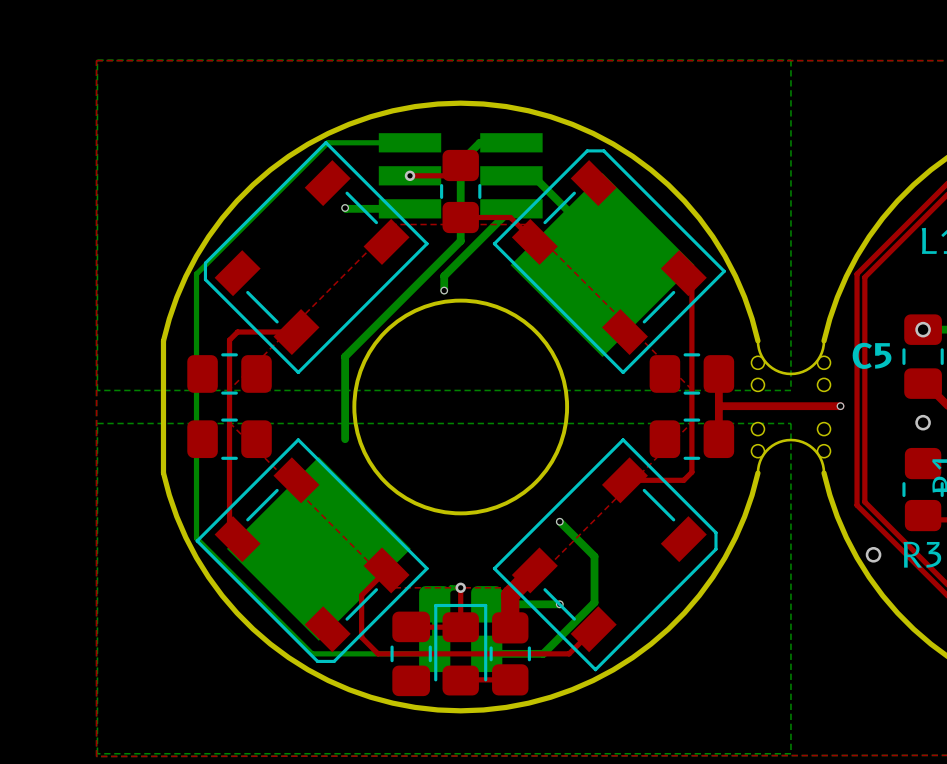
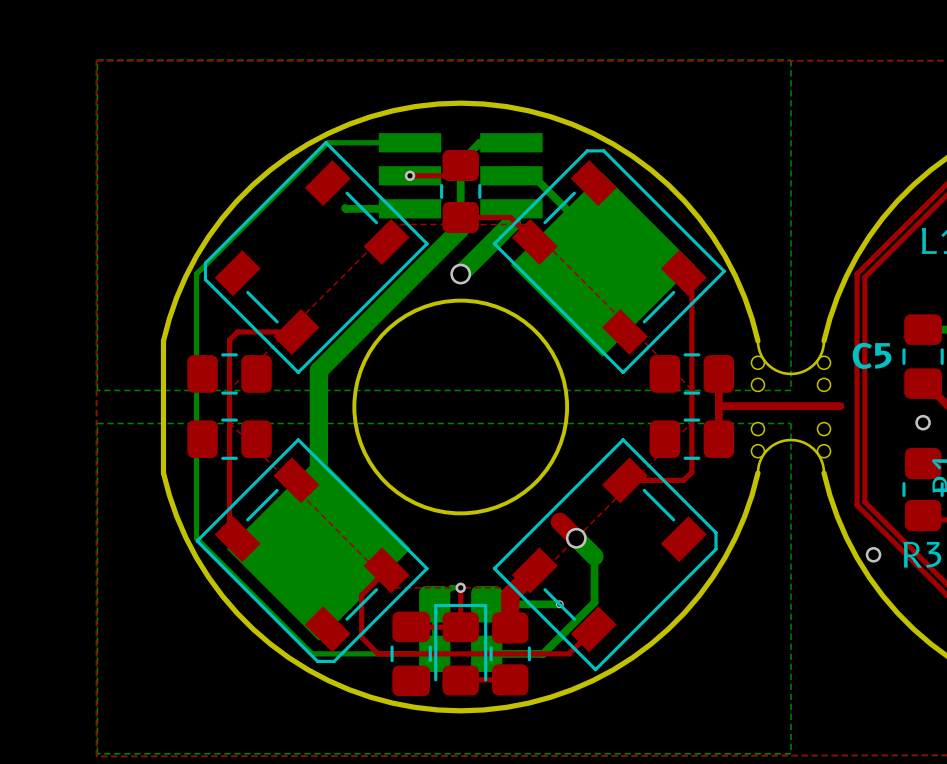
via: (345, 208) -> none
bottom track: (511, 208) (444, 276) (444, 290) -> (511, 208) (511, 223) (460, 274)
bottom track: (460, 228) (460, 241) (345, 356) (345, 439) -> (460, 228) (318, 370) (318, 548)
via: none -> (460, 274)
via: (444, 290) -> none
via: (923, 329) -> none
via: (840, 406) -> none
top track: none -> (559, 521) (576, 538)
bottom track: (559, 521) (576, 538) -> none
via: (559, 521) -> none
bottom track width: thin (576, 538) (594, 556) -> thick (576, 538) (594, 556)
via: none -> (576, 538)

